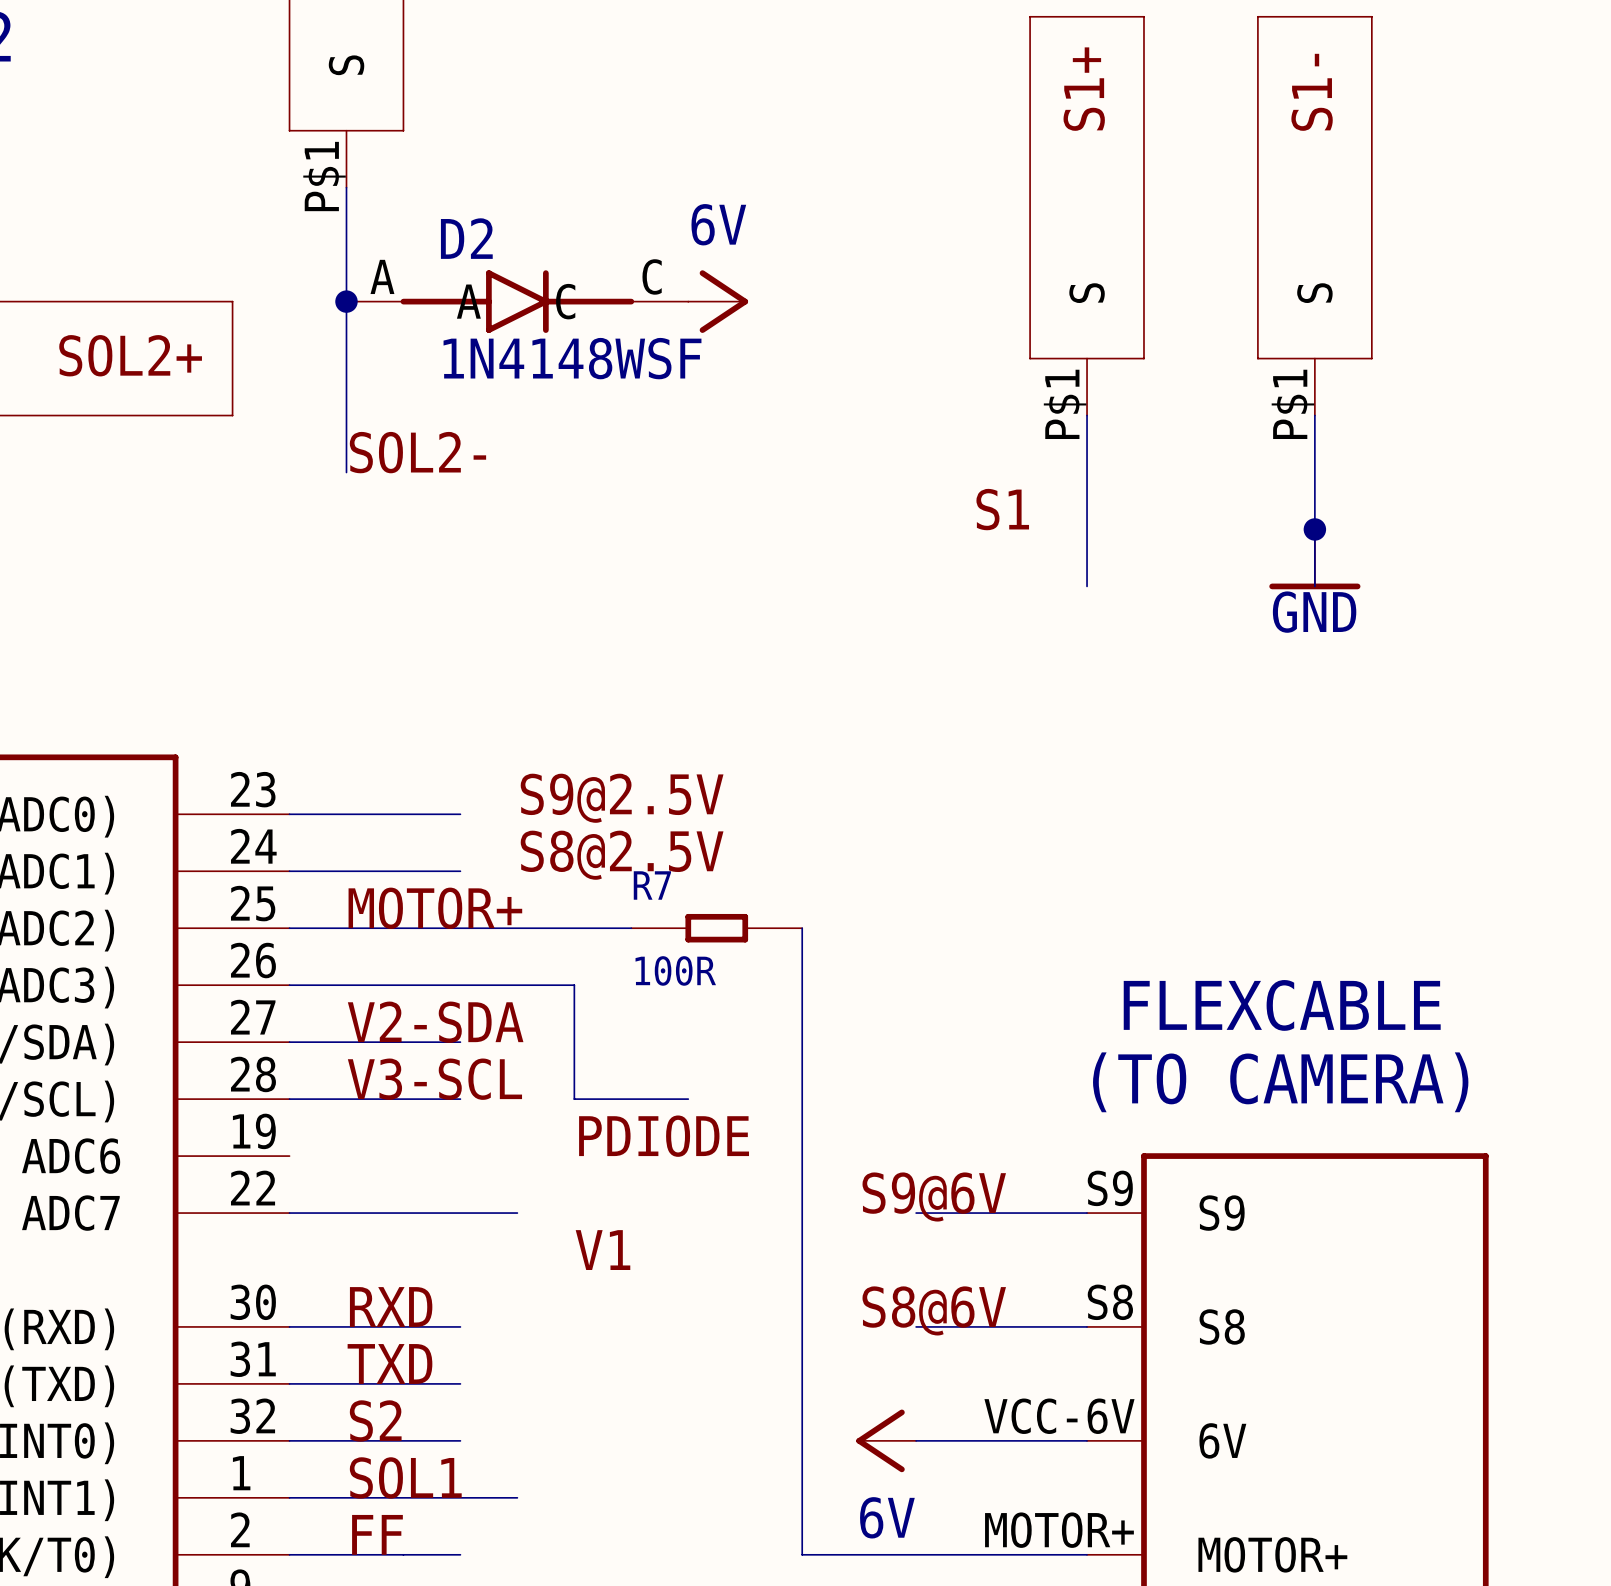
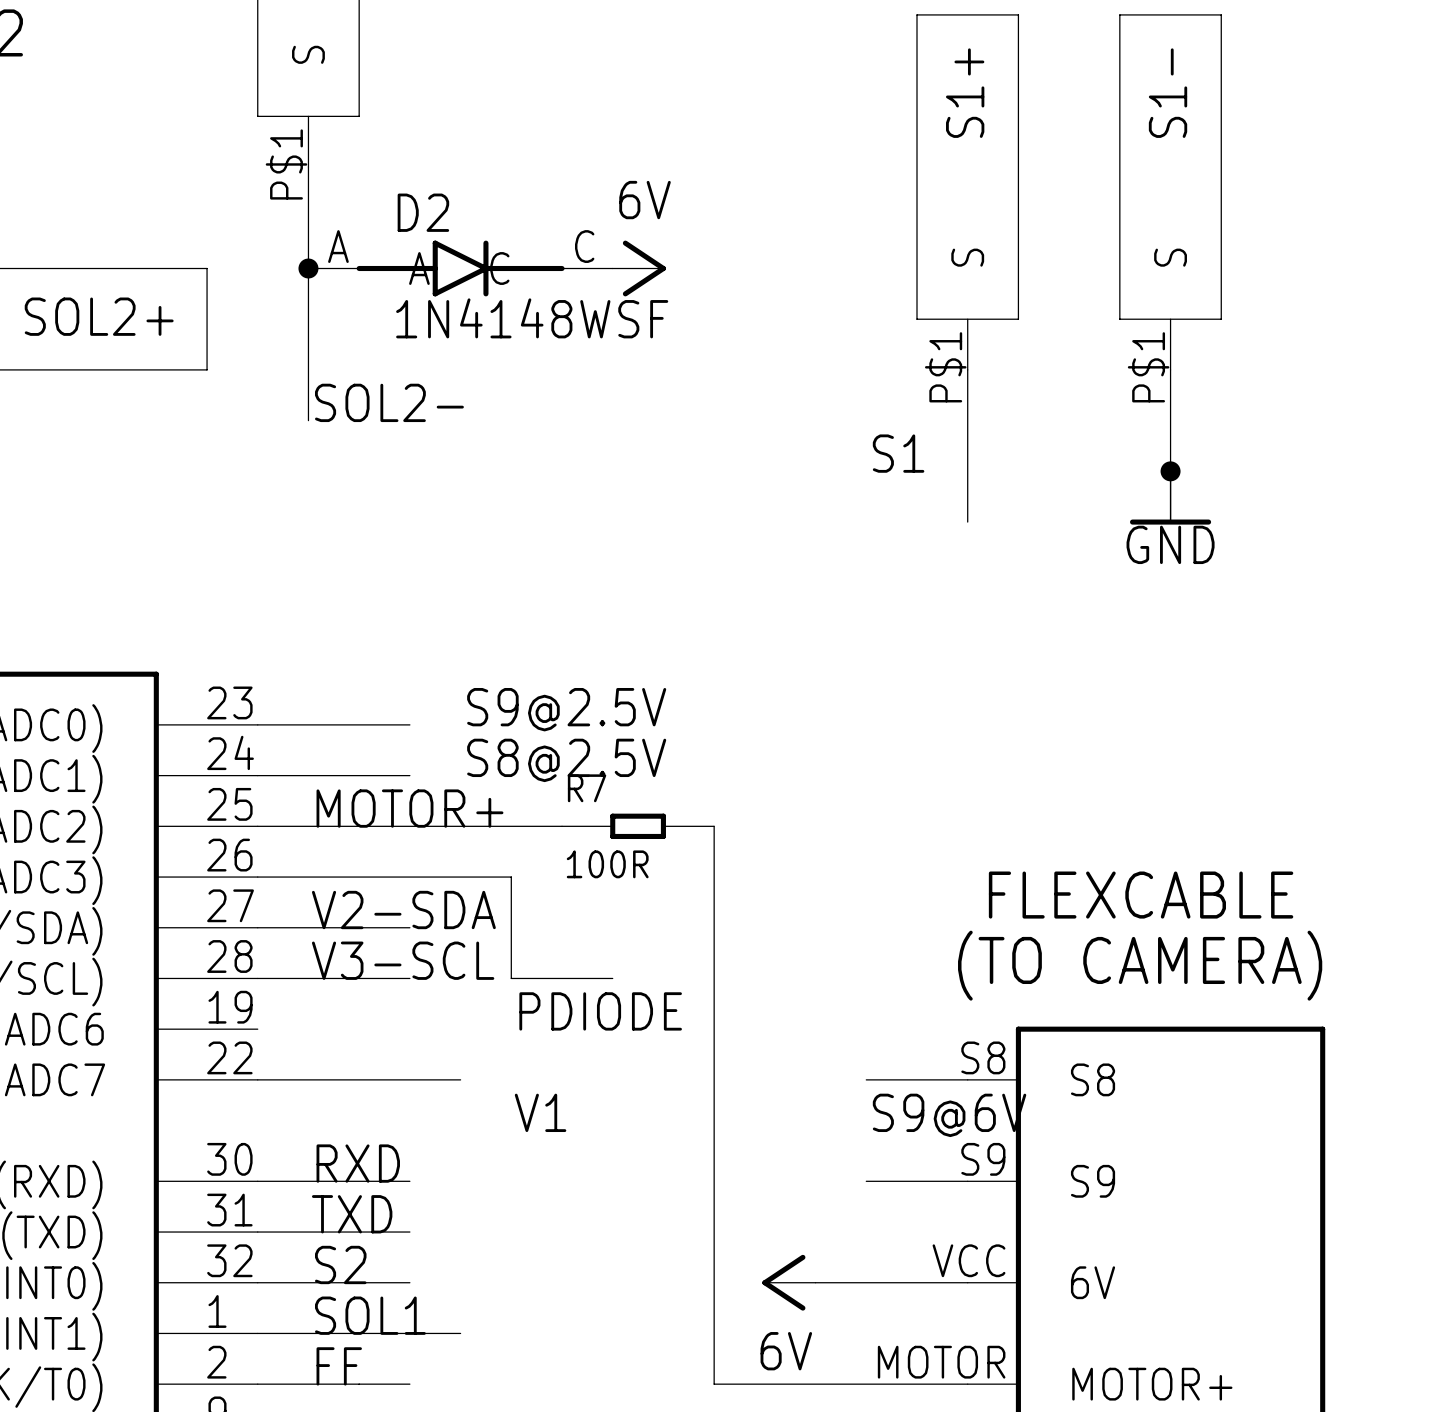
part pin number: S9 (1110, 1188) -> S8 (983, 1057)
label position: S9@6V (934, 1196) -> S9@6V (949, 1115)
wire: (916, 1213) (973, 1213) -> none
part pin name: S9 (1222, 1213) -> S8 (1093, 1079)
part pin number: S8 (1110, 1302) -> S9 (983, 1159)
label: S8@6V (934, 1310) -> none
wire: (916, 1326) (973, 1326) -> none
part pin name: S8 (1222, 1326) -> S9 (1093, 1181)
part pin number: VCC-6V (1059, 1416) -> VCC (969, 1260)
part pin number: MOTOR+ (1059, 1530) -> MOTOR (941, 1362)

